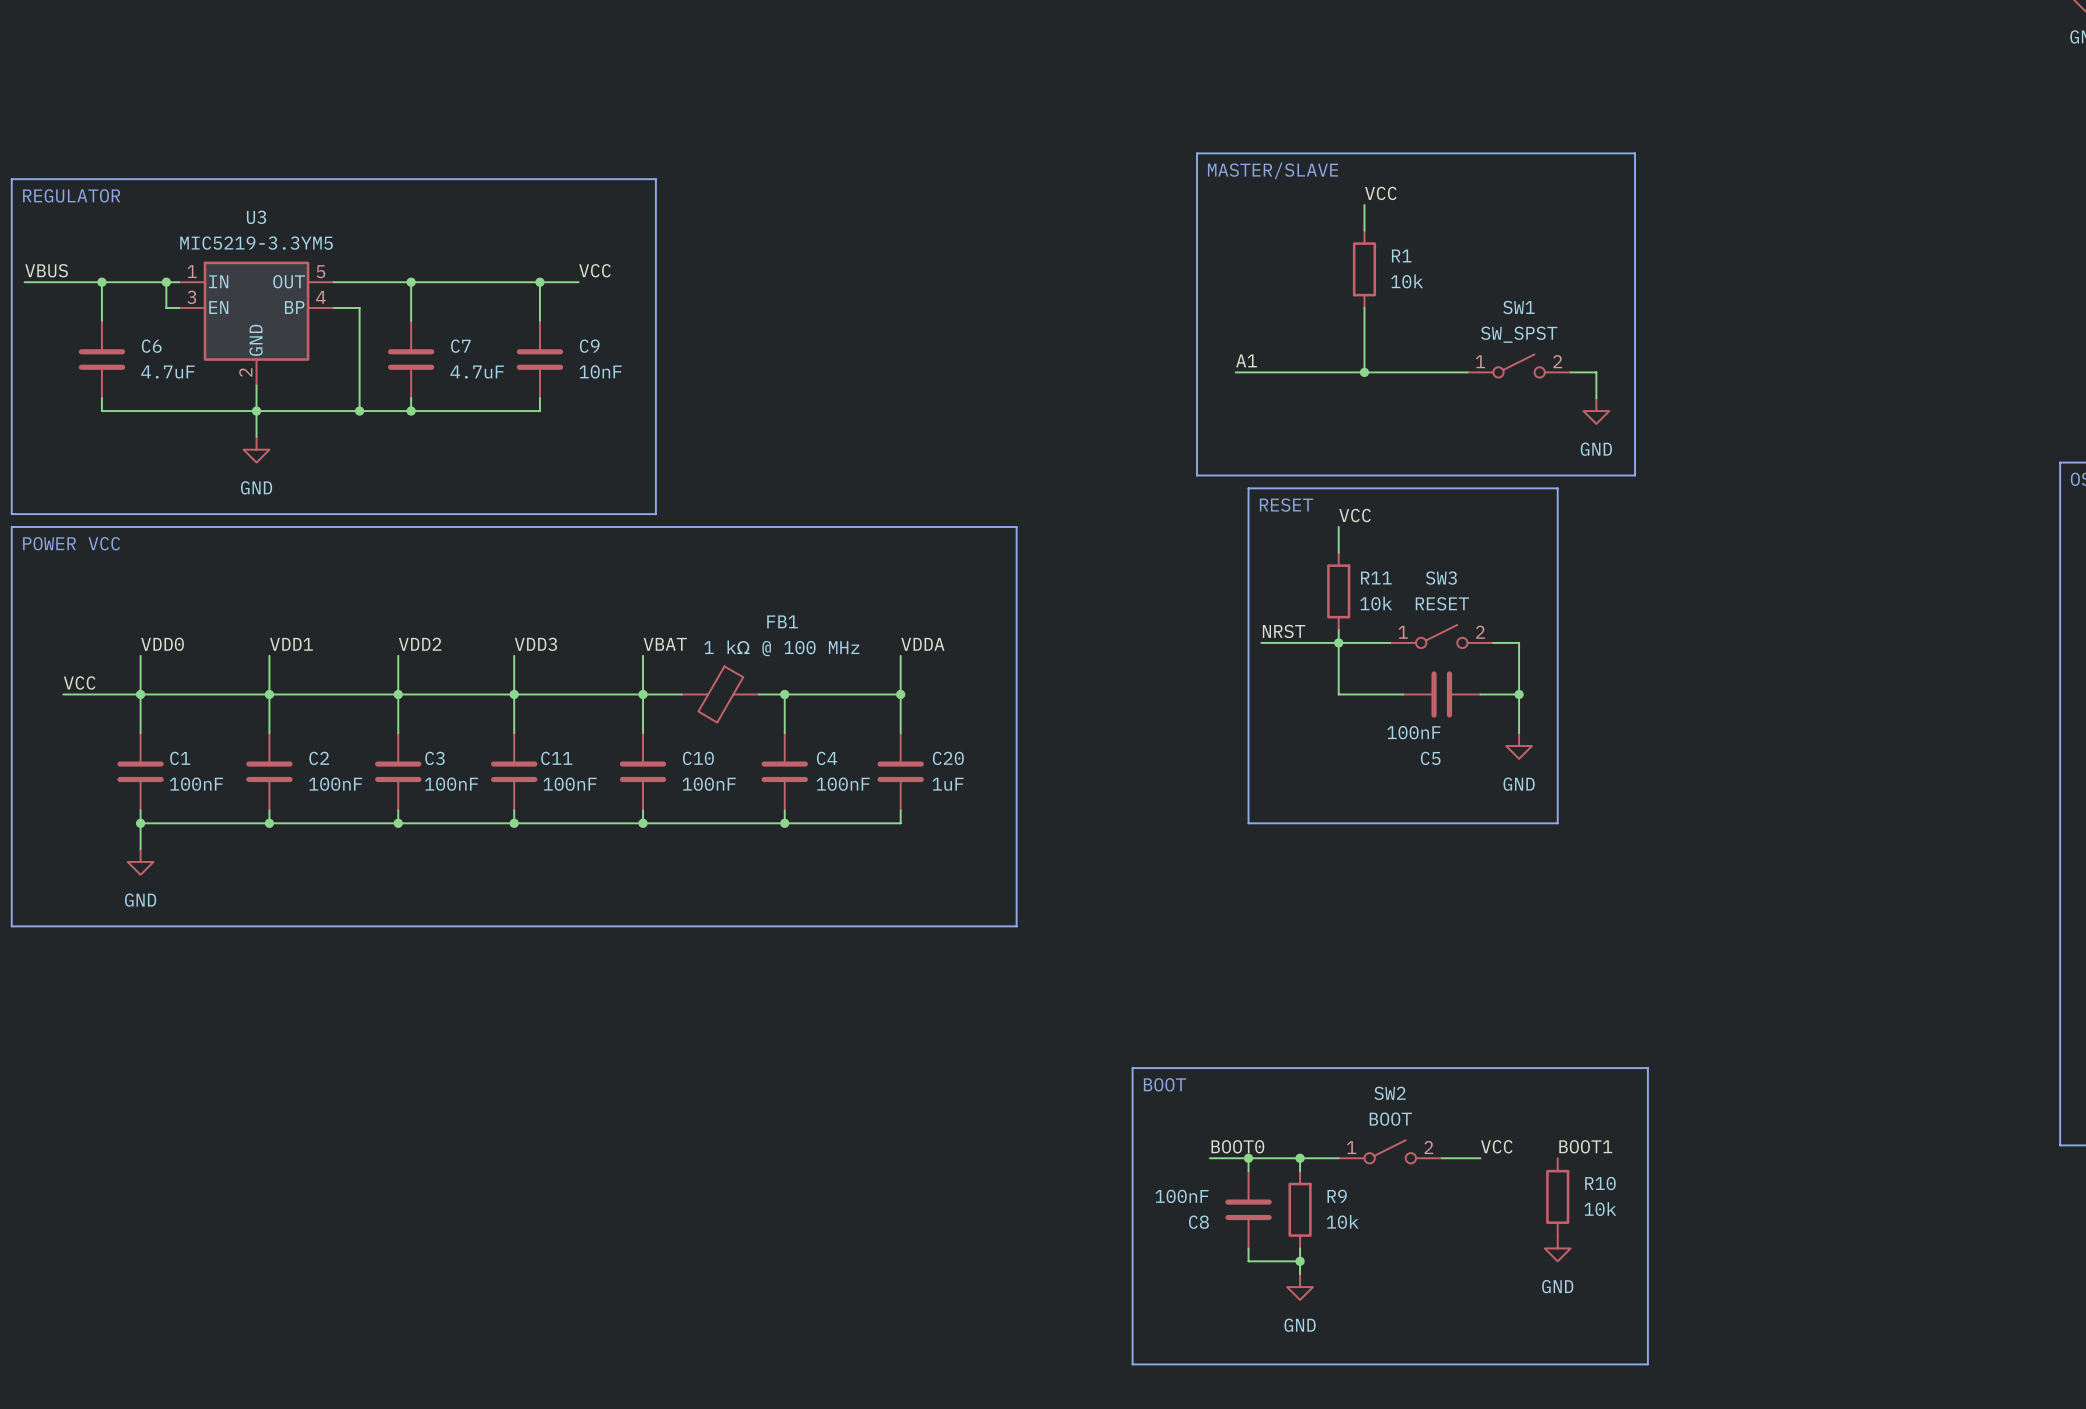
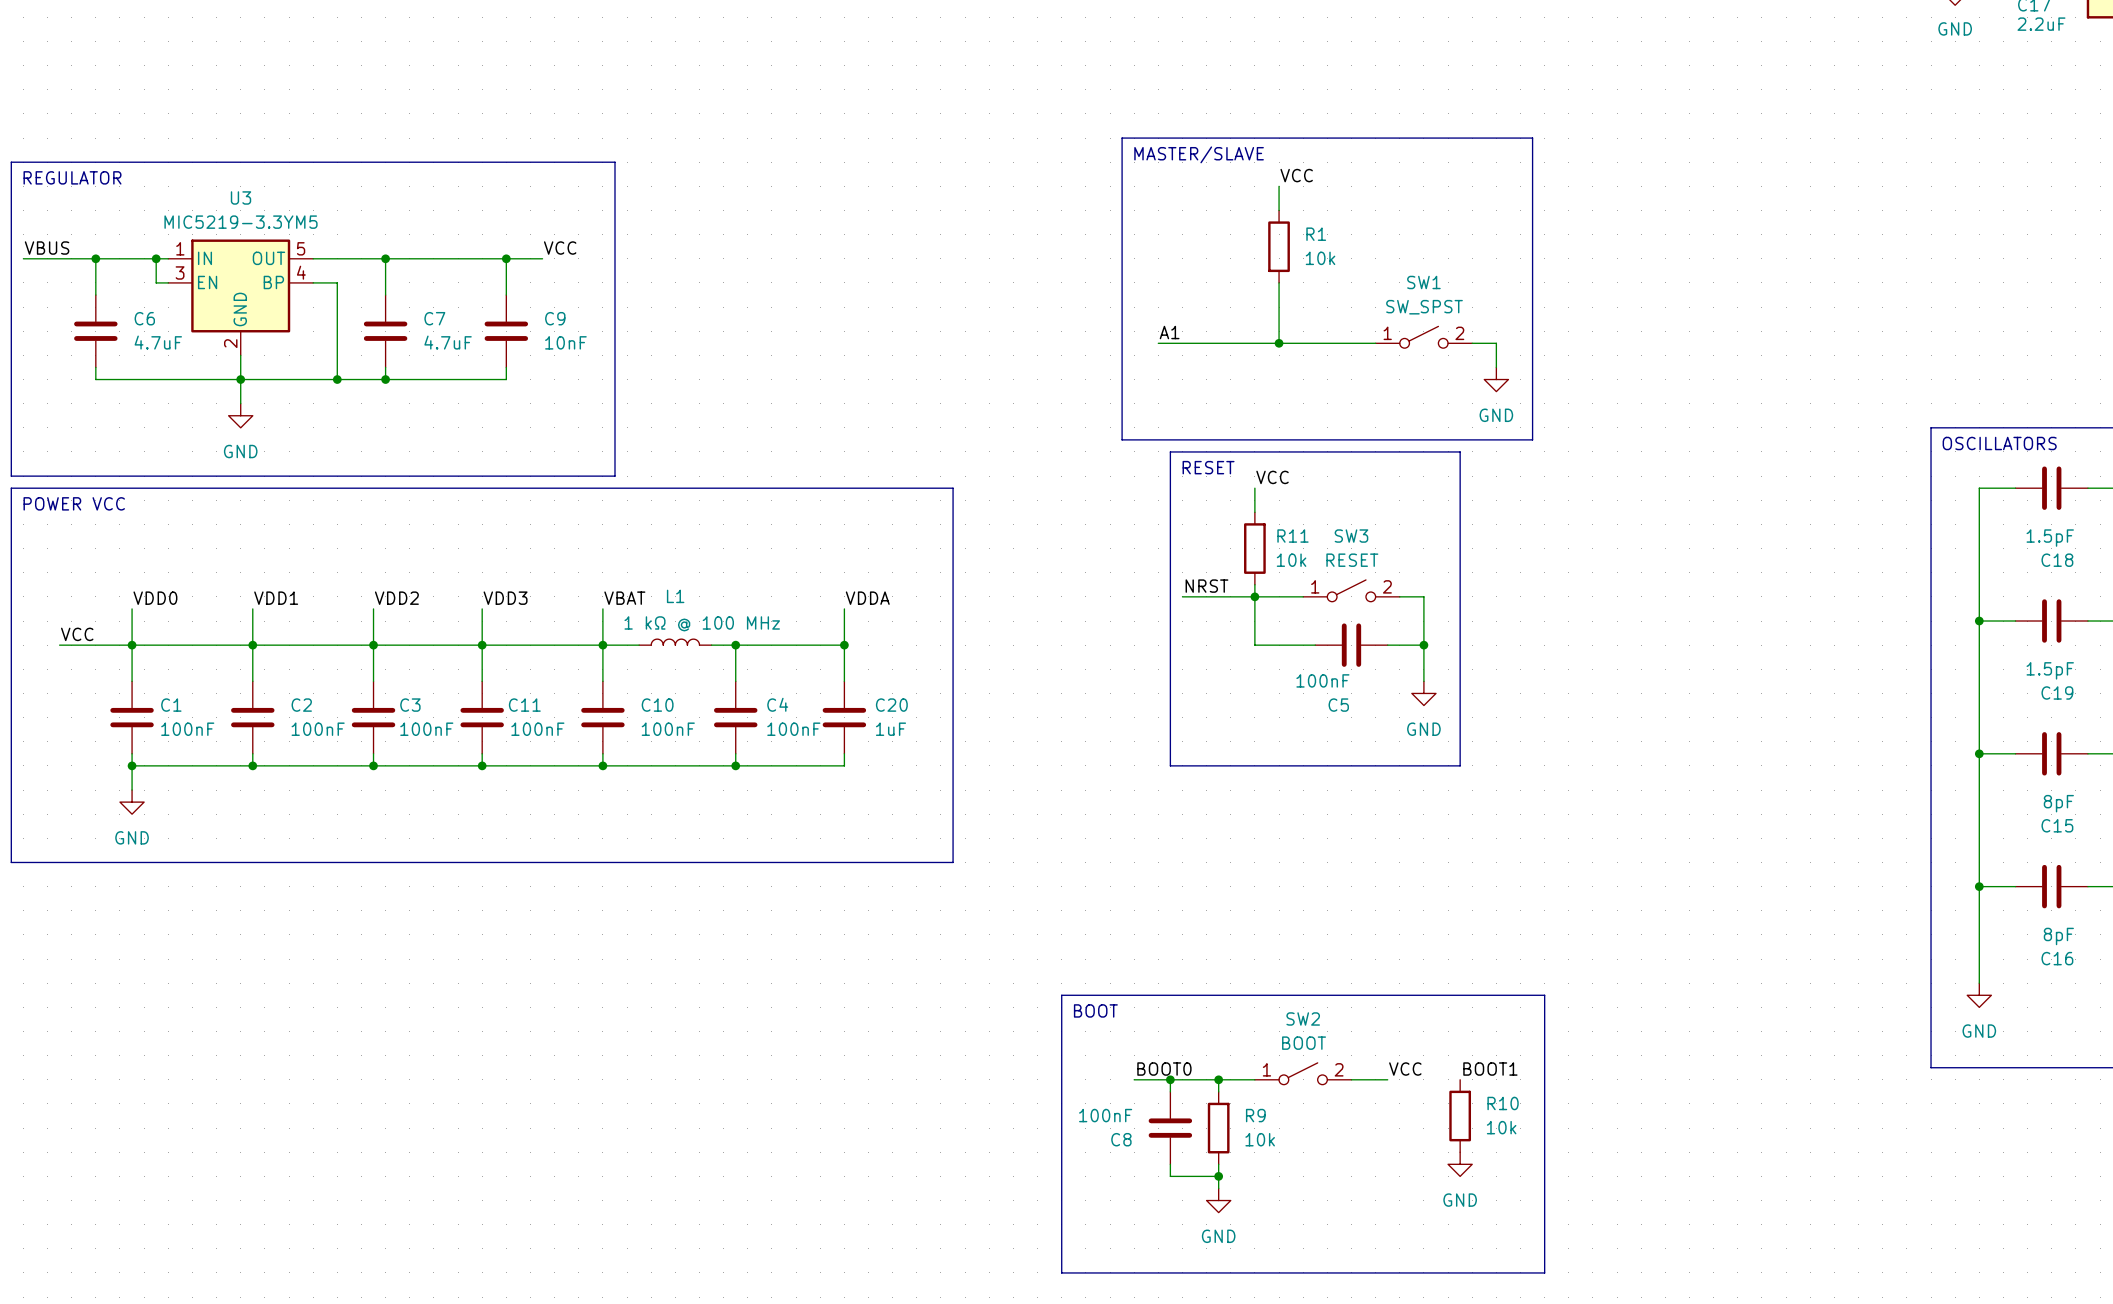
L1: none -> 1 kΩ @ 100 MHz (675, 642)
FB1: 1 kΩ @ 100 MHz (720, 694) -> none

